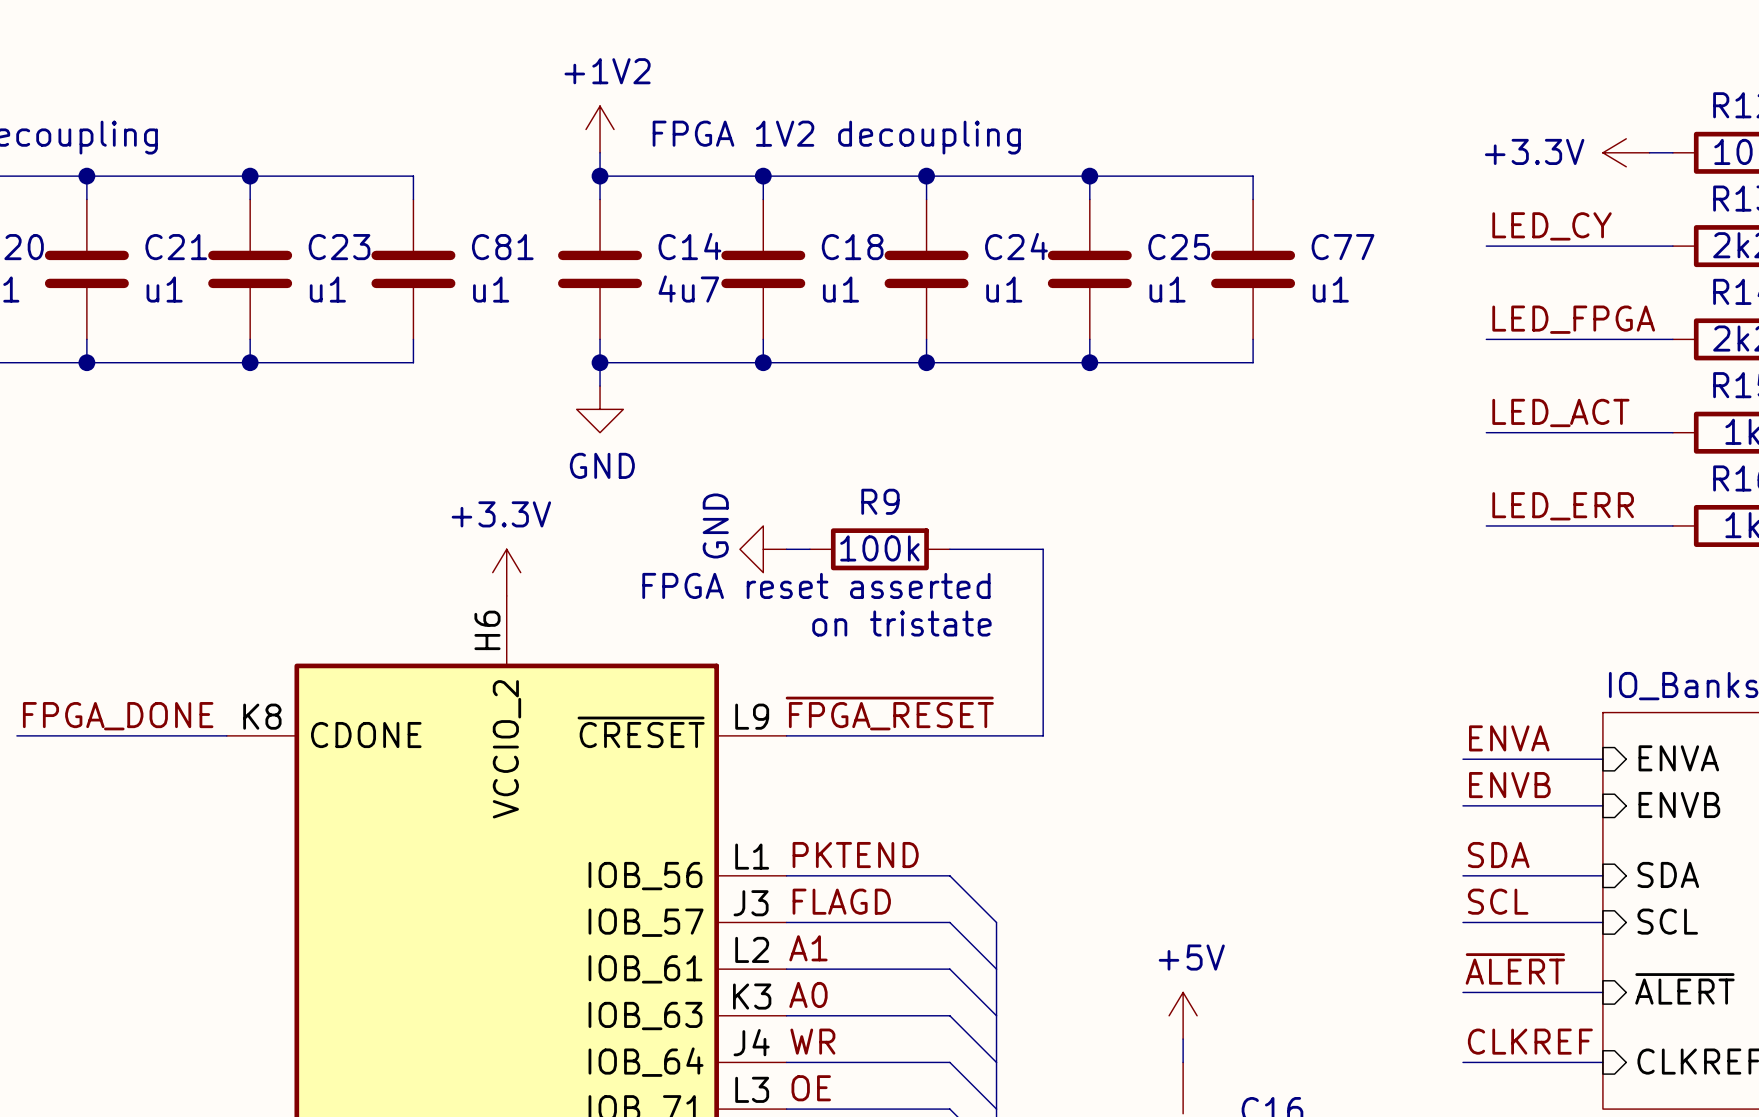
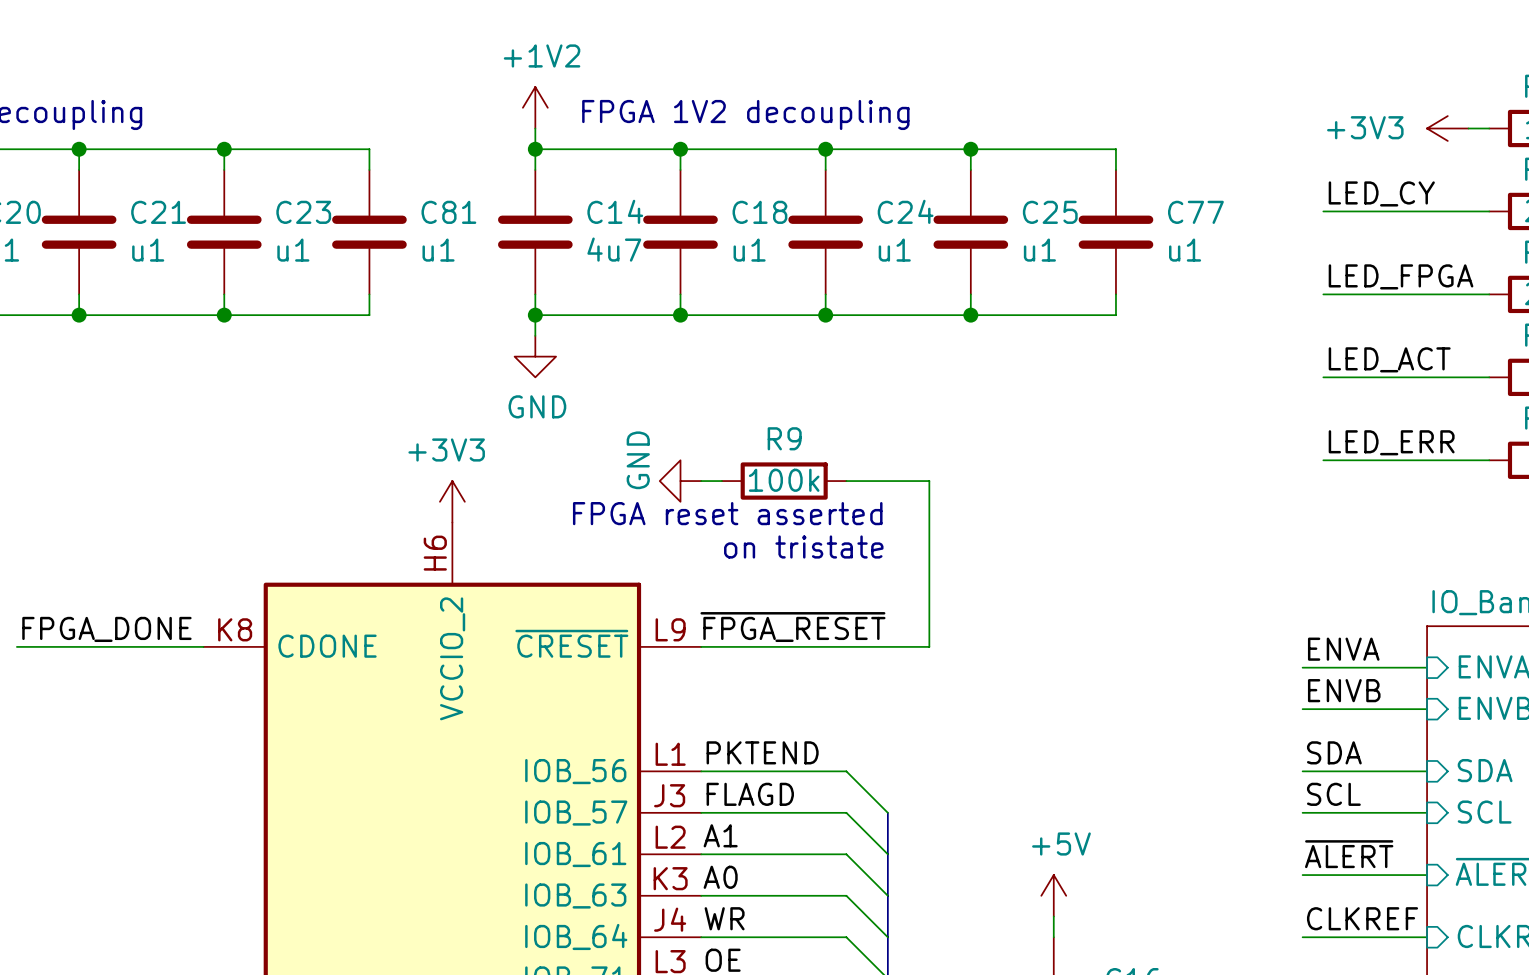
power symbol: +3.3V (1626, 152) -> +3V3 (1447, 128)
power symbol: +3.3V (506, 572) -> +3V3 (452, 501)

